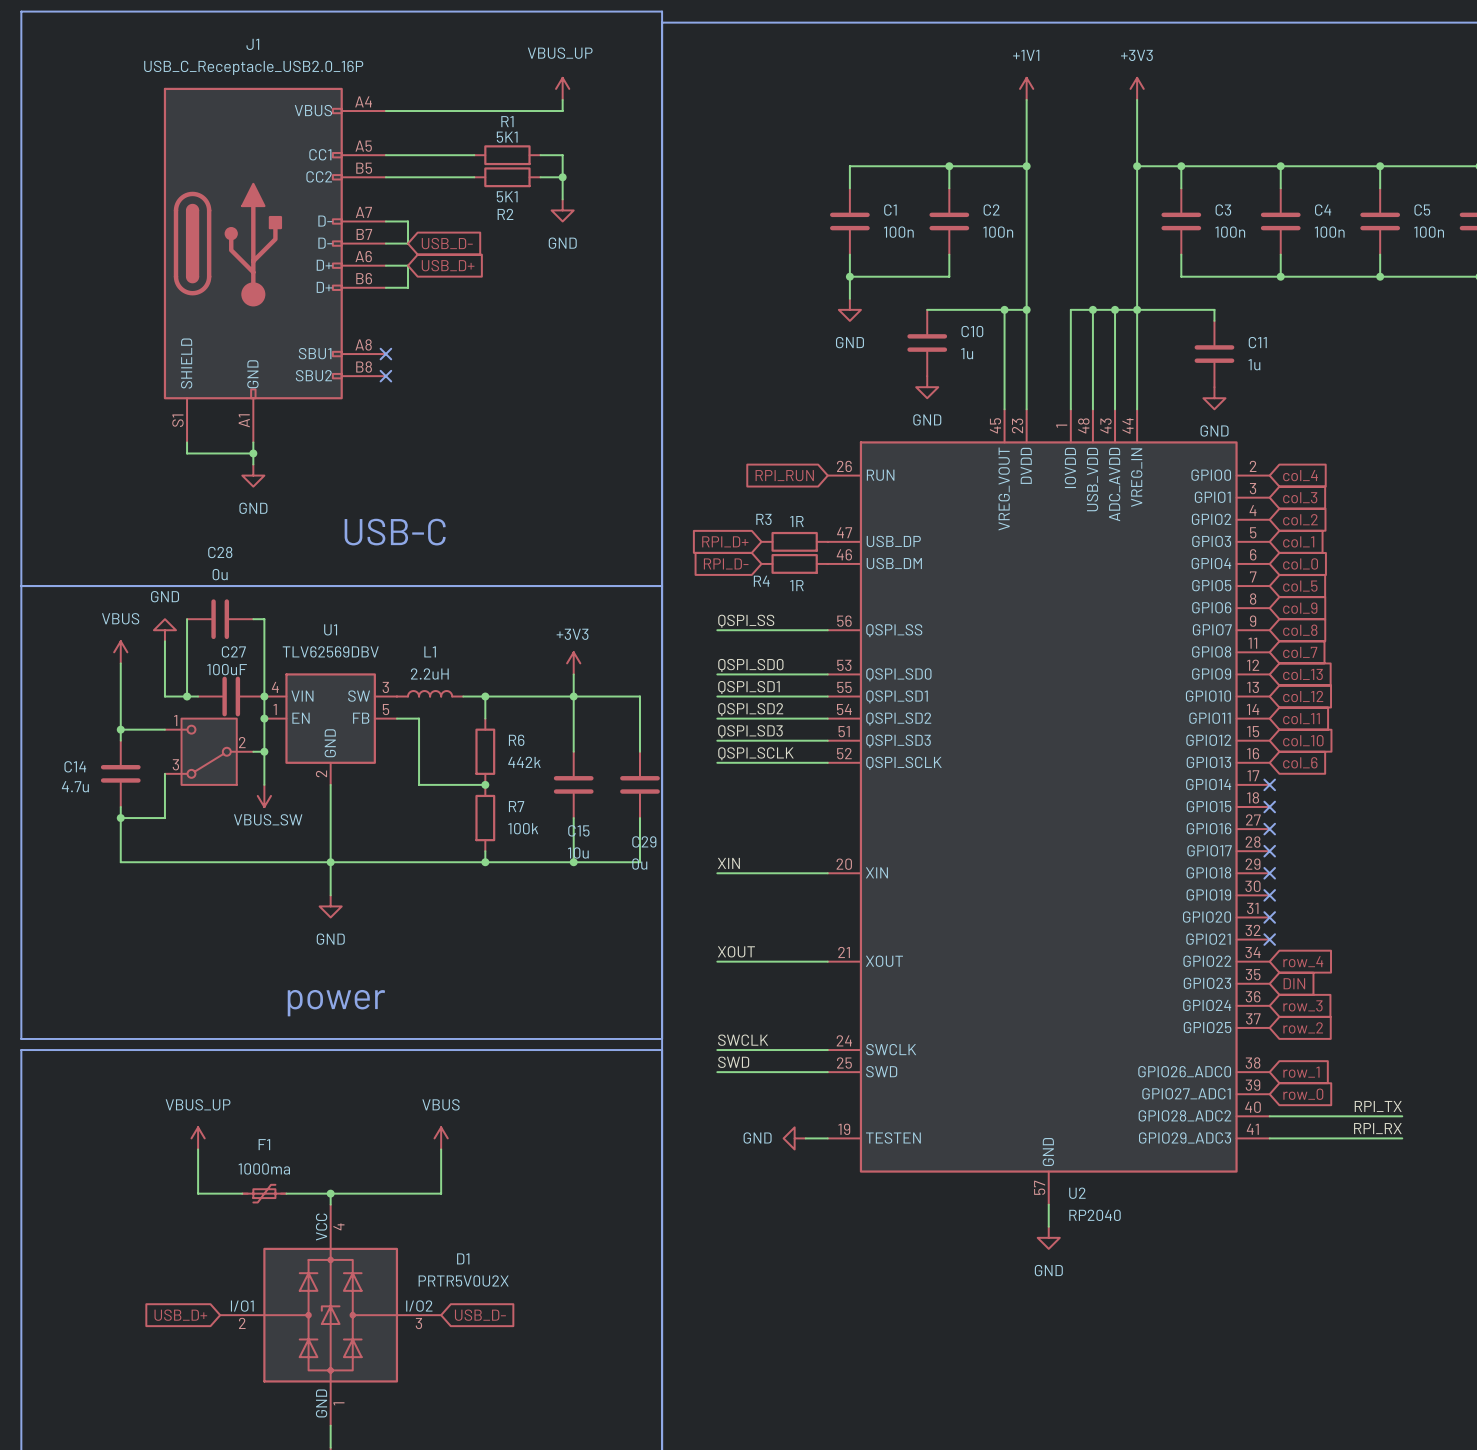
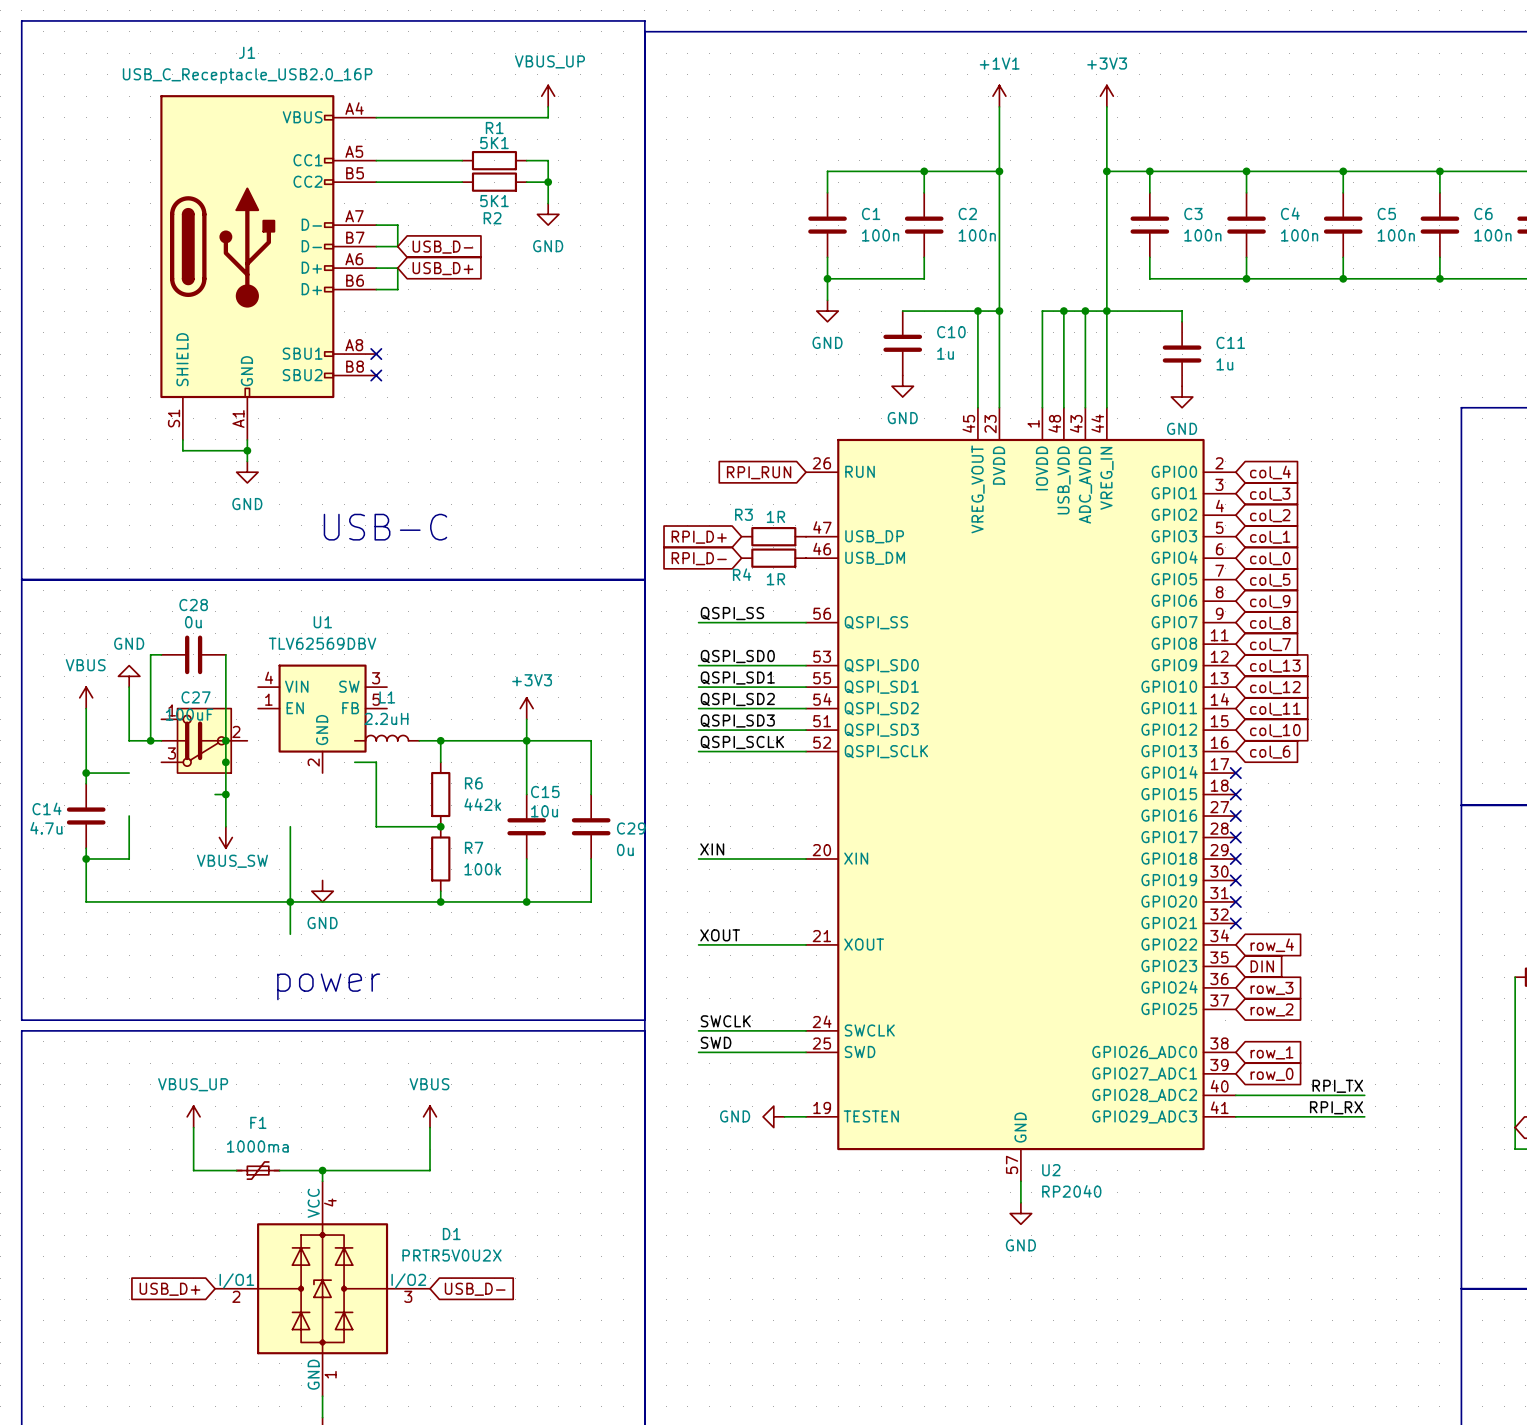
C28 name position: C28 (220, 552) -> C28 (193, 605)
C28 value position: 0u (220, 574) -> 0u (193, 622)
wire: (187, 619) (187, 696) -> none
C28 position: (220, 619) -> (193, 654)
wire: (253, 619) (264, 619) (264, 784) -> none
power symbol position: GND (164, 630) -> GND (129, 676)
wire: (164, 641) (164, 696) (198, 696) -> (129, 687) (129, 740) (161, 740)
power symbol position: VBUS (120, 652) -> VBUS (86, 697)
wire: (120, 663) (120, 740) -> (86, 708) (86, 783)
wire: none -> (161, 654) (150, 654) (150, 740)
wire: none -> (225, 654) (225, 826)
power symbol position: +3V3 (573, 663) -> +3V3 (526, 708)
wire: (573, 674) (573, 751) -> (526, 719) (526, 794)
L1 position: (430, 693) -> (387, 738)
junction: (187, 696) -> none
C27 position: (231, 696) -> (193, 740)
junction: (264, 696) -> none
wire: (463, 696) (639, 696) (639, 751) -> (419, 740) (591, 740) (591, 794)
wire: (485, 696) (485, 718) -> (440, 740) (440, 762)
junction: (485, 696) -> none
junction: (573, 696) -> none
junction: (264, 718) -> none
wire: (396, 718) (419, 718) (419, 784) (485, 784) -> (354, 762) (376, 762) (376, 826) (440, 826)
wire: (120, 729) (164, 729) -> (86, 773) (129, 773)
junction: (120, 729) -> none
junction: none -> (150, 740)
junction: none -> (225, 740)
wire: (253, 751) (264, 751) -> (215, 794) (225, 794)
junction: (264, 751) -> none
junction: none -> (440, 740)
R6 position: (485, 751) -> (440, 794)
junction: none -> (526, 740)
C14 position: (120, 773) -> (86, 816)
wire: (164, 773) (164, 818) (120, 818) -> (129, 816) (129, 858) (86, 858)
junction: none -> (225, 762)
junction: none -> (86, 773)
wire: (330, 784) (330, 895) -> (290, 826) (290, 934)
junction: (485, 784) -> none
C15 position: (573, 784) -> (526, 826)
C29 position: (639, 784) -> (591, 826)
power symbol position: VBUS_SW (264, 795) -> VBUS_SW (225, 837)
wire: (120, 806) (120, 862) (639, 862) (639, 818) -> (86, 848) (86, 901) (591, 901) (591, 858)
junction: none -> (225, 794)
junction: (120, 818) -> none
R7 position: (485, 818) -> (440, 858)
wire: (573, 818) (573, 862) -> (526, 858) (526, 901)
C15 name position: C15 (578, 830) -> C15 (545, 791)
junction: none -> (440, 826)
wire: (485, 851) (485, 862) -> (440, 891) (440, 901)
C15 value position: 10u (578, 852) -> 10u (544, 811)
junction: (330, 862) -> none
junction: (485, 862) -> none
junction: (573, 862) -> none
junction: none -> (86, 858)
junction: none -> (290, 901)
junction: none -> (440, 901)
junction: none -> (526, 901)

